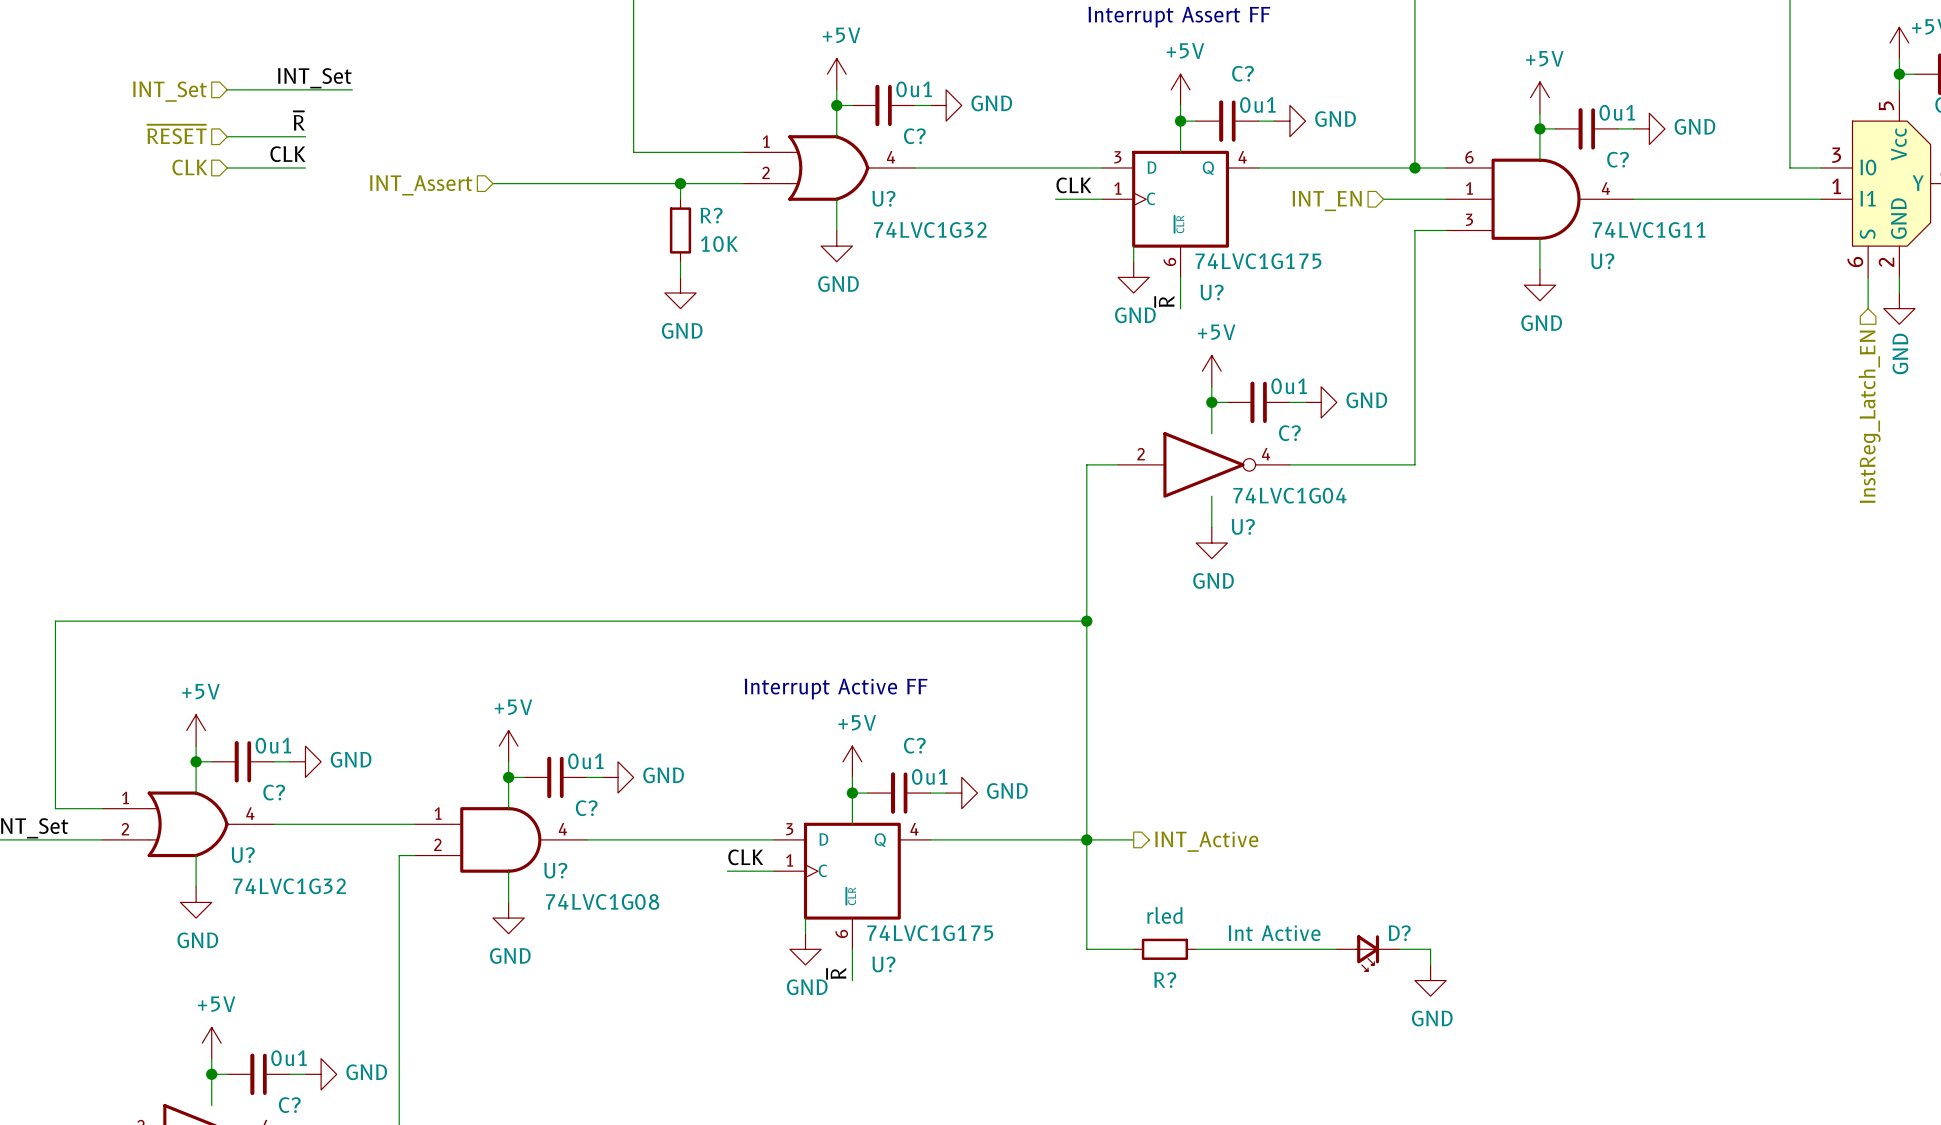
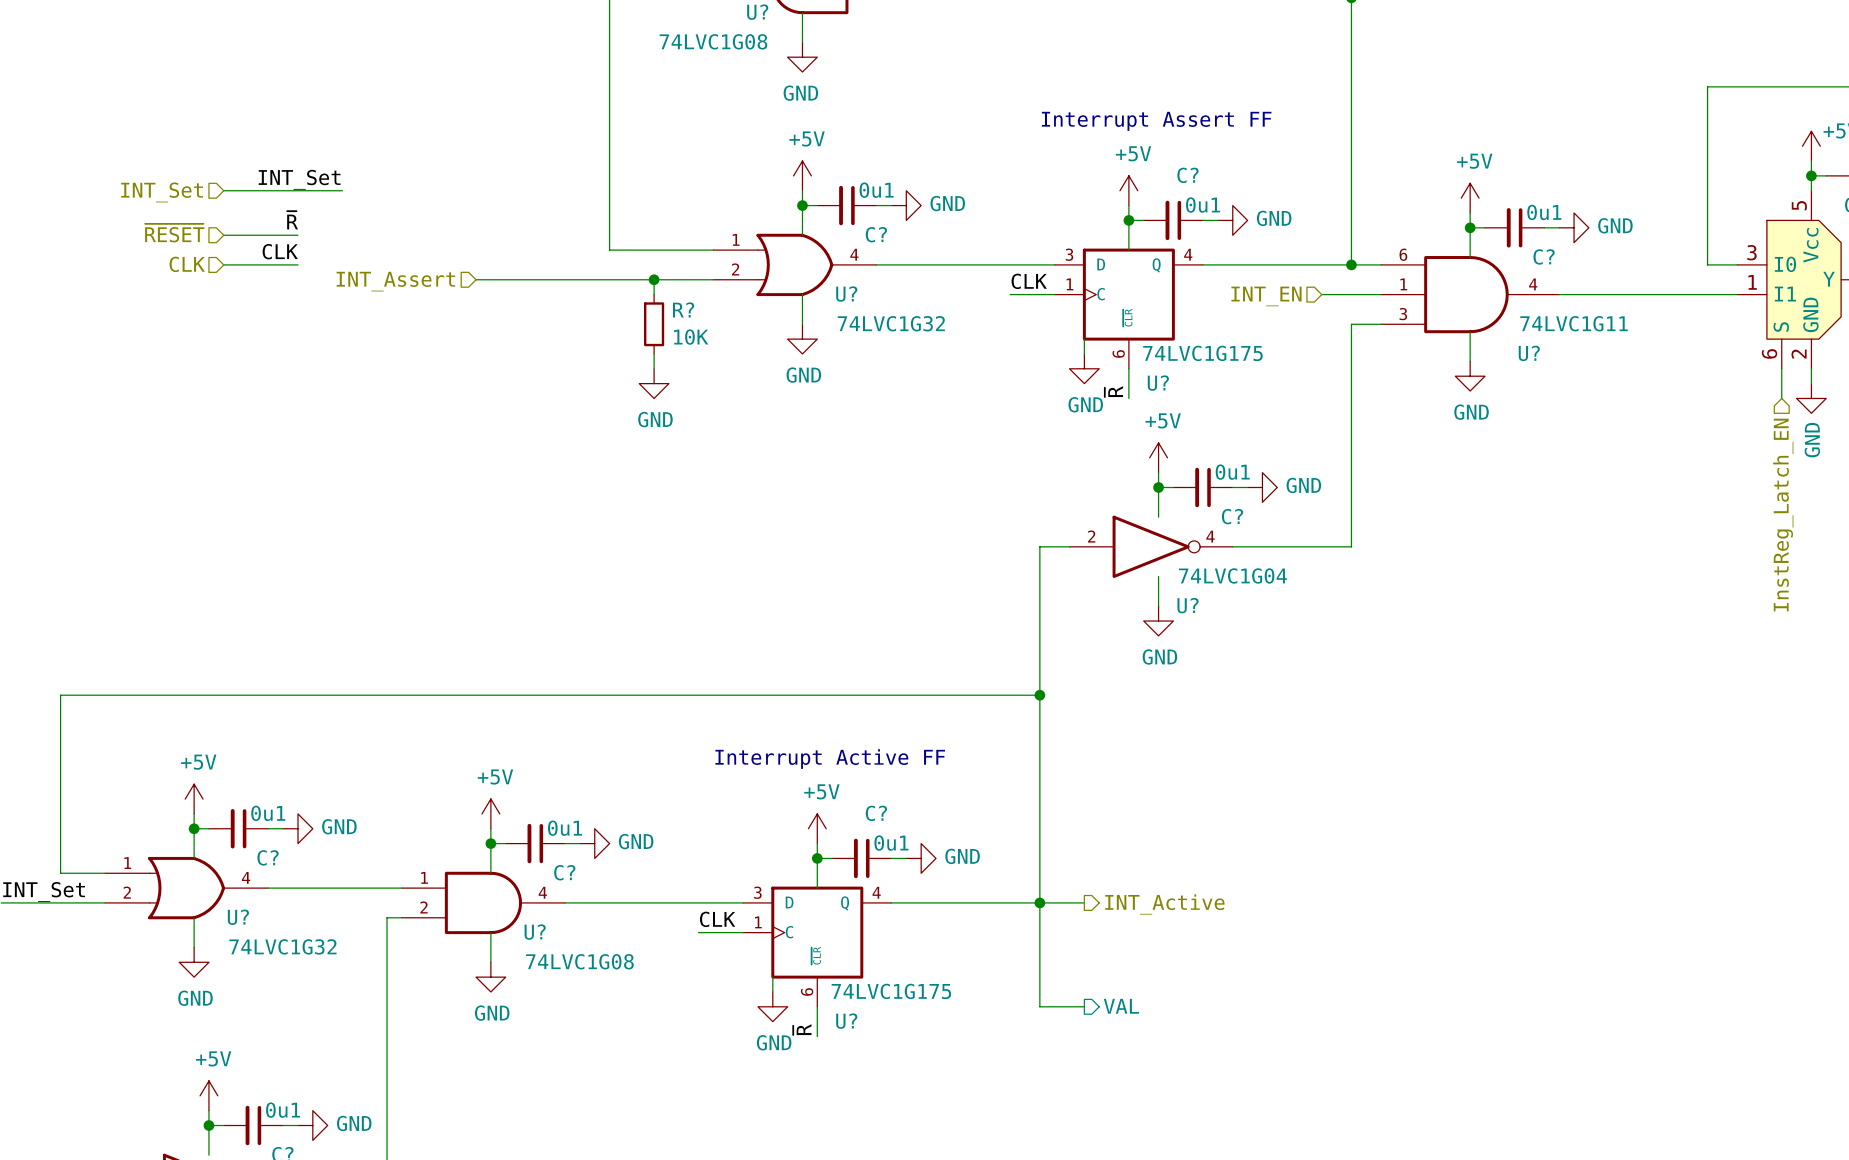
sheet pin: none -> VAL (1121, 1006)
R?: rled (1164, 949) -> none
wire: (1196, 949) (1336, 949) -> none
wire: (1399, 949) (1430, 949) (1430, 964) -> none
D?: Int Active (1368, 953) -> none
power symbol: GND (1430, 980) -> none

